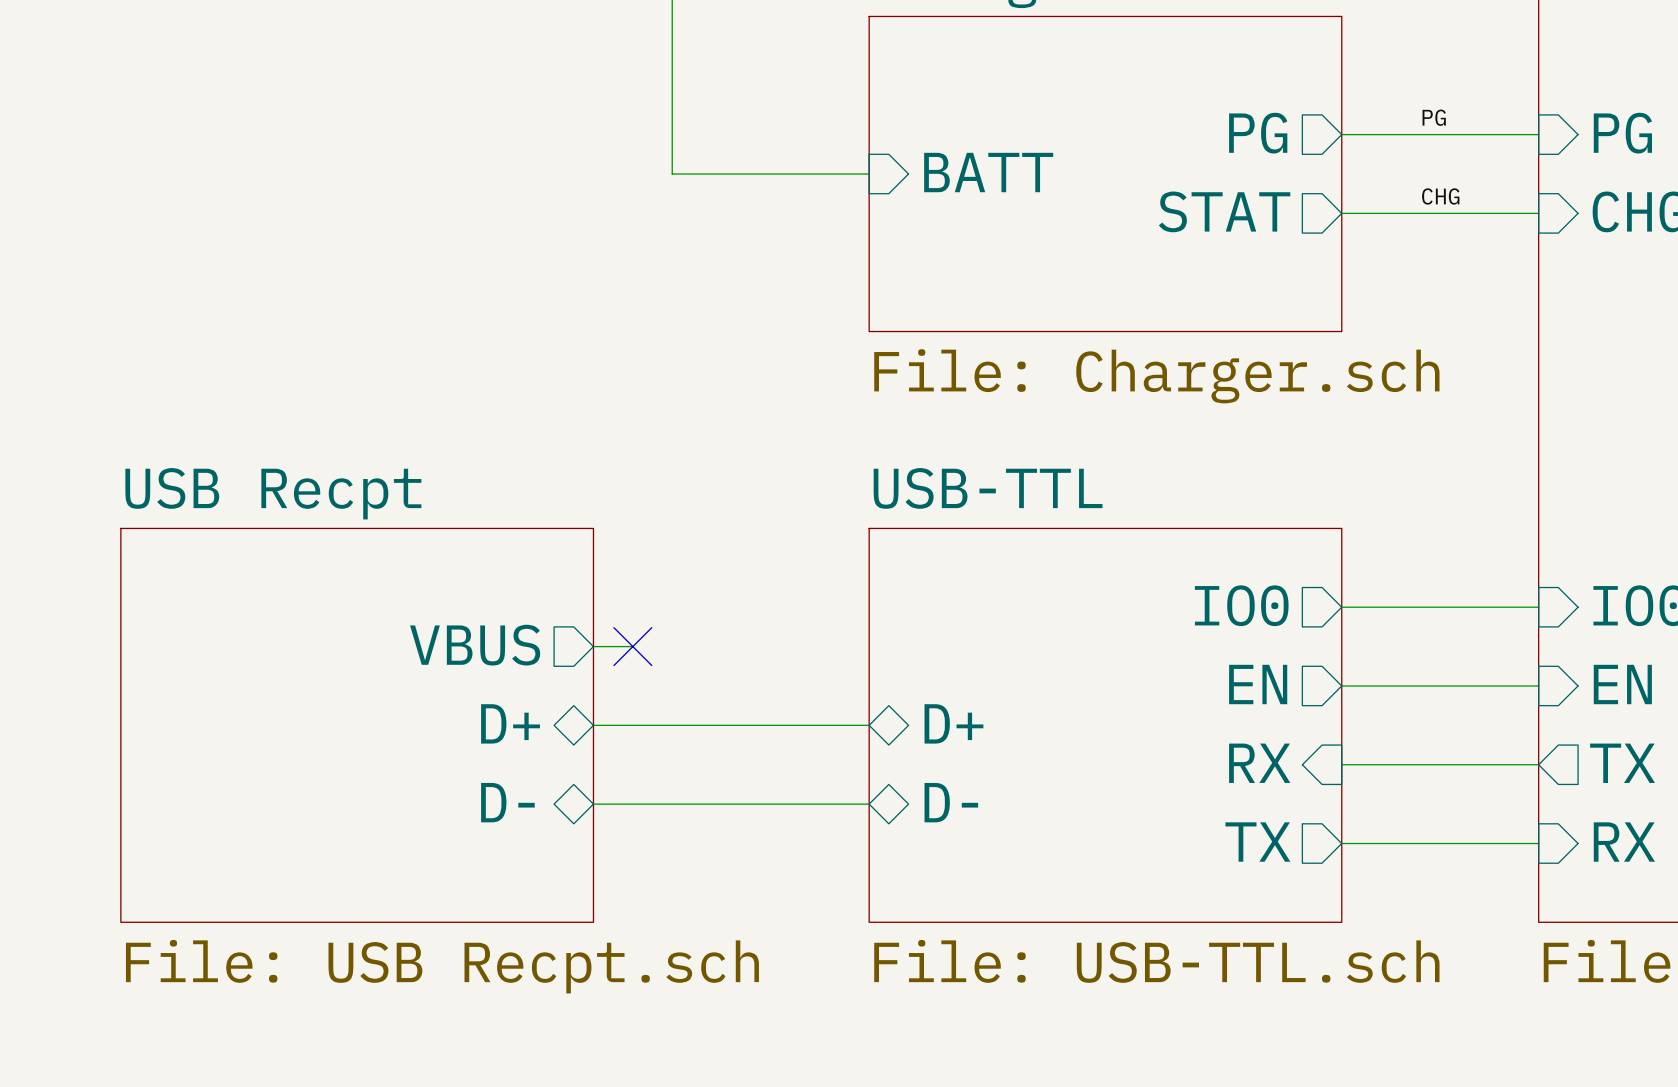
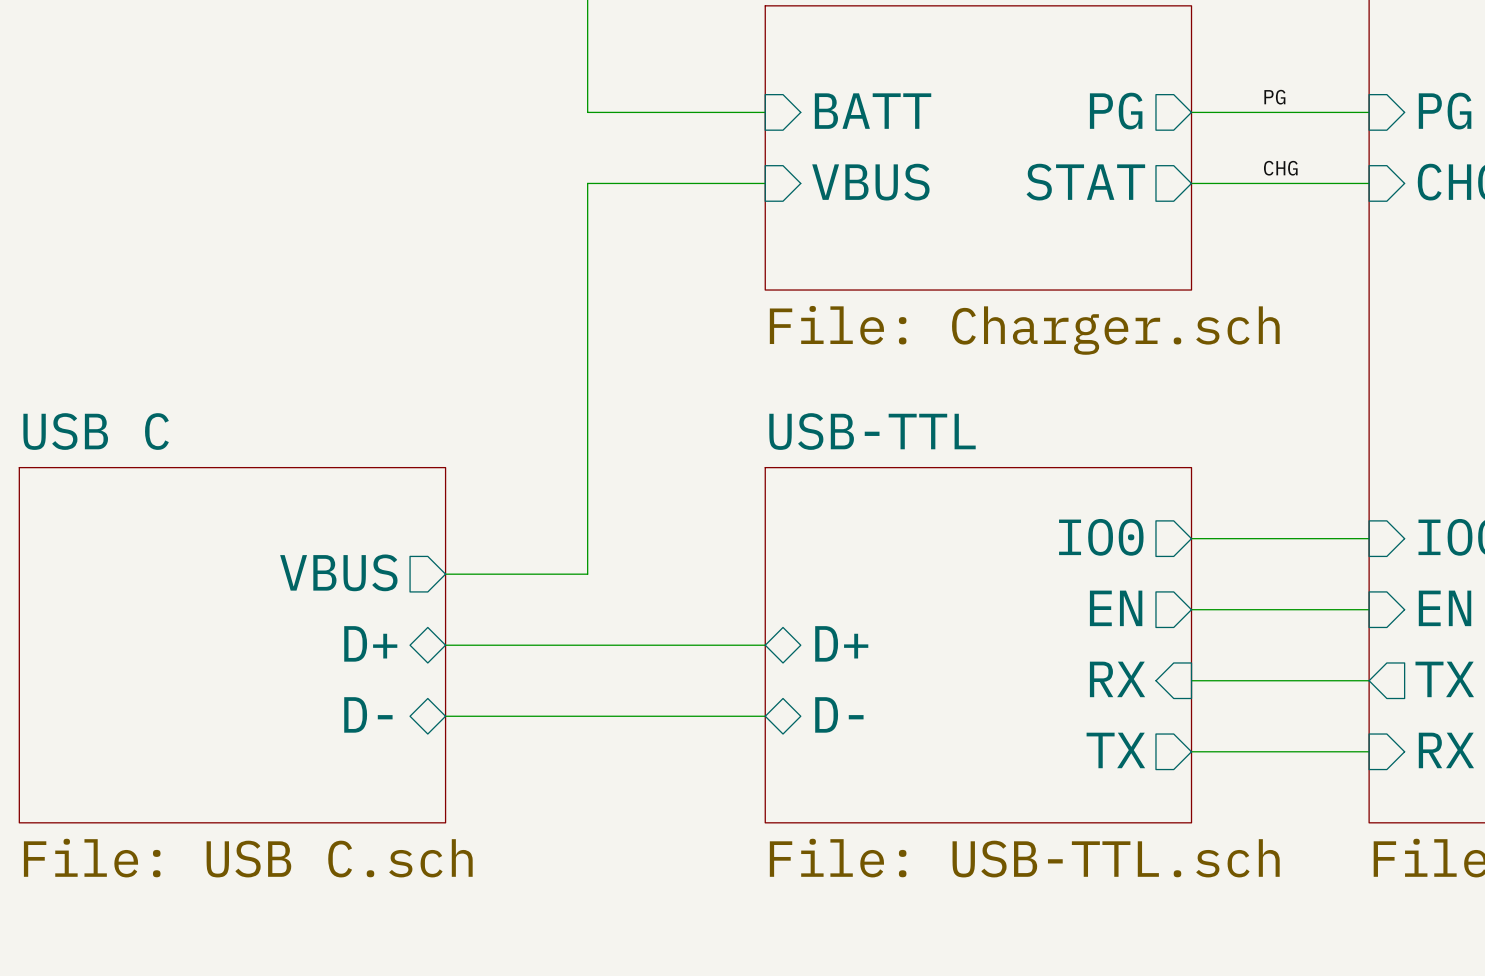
wire: (672, 134) (672, 173) (869, 173) -> (587, 112) (765, 112)
sheet pin position: BATT (988, 172) -> BATT (873, 111)
sheet pin: none -> VBUS (870, 182)
wire: none -> (765, 183) (587, 183) (587, 574) (552, 574)
sheet pin position: VBUS (475, 645) -> VBUS (338, 572)
wire: none -> (445, 574) (516, 574)
no-connect mark: (632, 646) -> none
sheet pin position: D+ (510, 723) -> D+ (370, 643)
sheet USB C: none -> File: USB C.sch (232, 645)
sheet USB Recpt: File: USB Recpt.sch (357, 725) -> none
wire: none -> (445, 645) (516, 645)
sheet pin position: D- (507, 802) -> D- (368, 714)
wire: none -> (445, 716) (516, 716)

